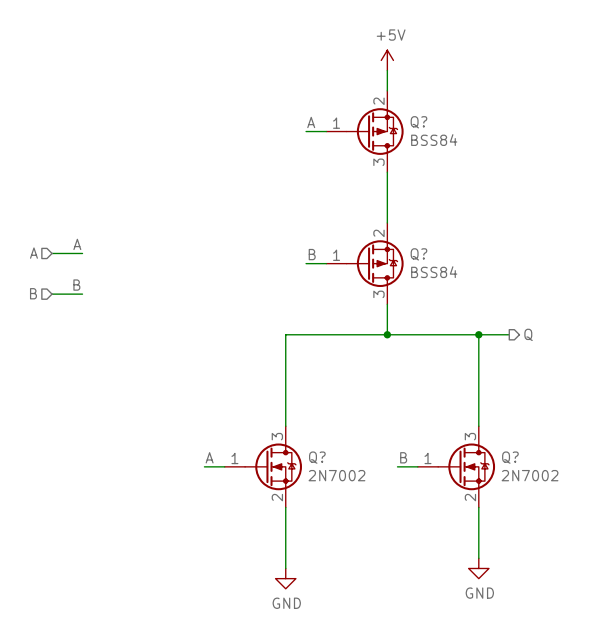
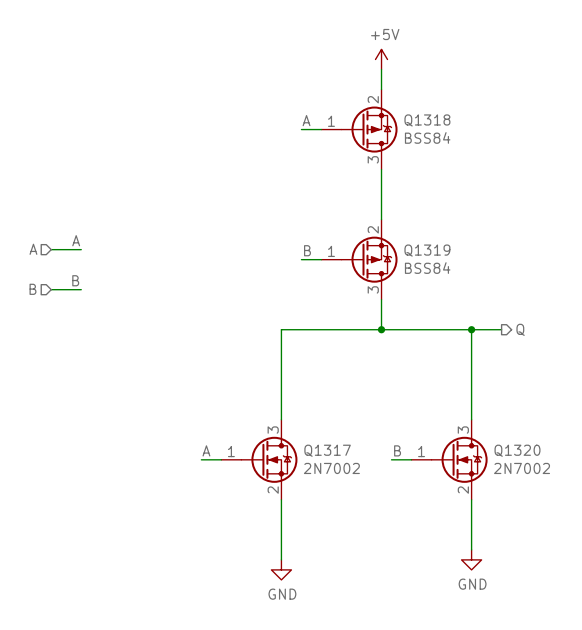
Q? name: Q? (418, 122) -> Q1318 (427, 120)
Q? name: Q? (418, 254) -> Q1319 (427, 250)
Q? name: Q? (317, 457) -> Q1317 (327, 450)
Q? name: Q? (510, 457) -> Q1320 (517, 450)

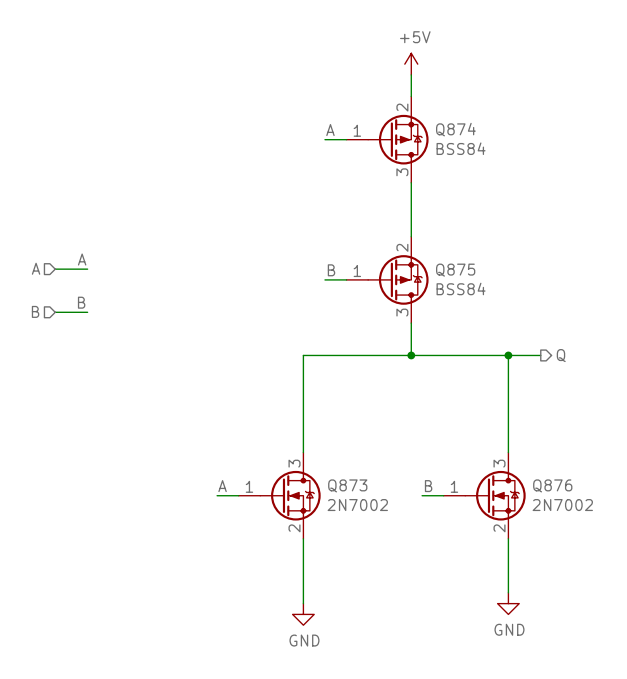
Q1318 name: Q1318 (427, 120) -> Q874 (455, 129)
Q1319 name: Q1319 (427, 250) -> Q875 (455, 270)
Q1317 name: Q1317 (327, 450) -> Q873 (347, 485)
Q1320 name: Q1320 (517, 450) -> Q876 (552, 485)

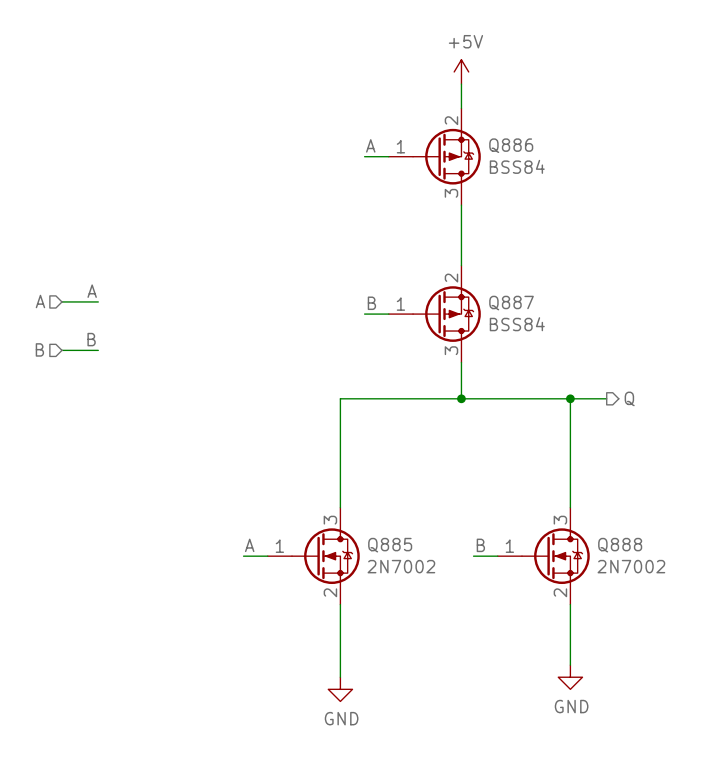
Q874 name: Q874 (455, 129) -> Q886 (511, 145)
Q875 name: Q875 (455, 270) -> Q887 (511, 303)
Q873 name: Q873 (347, 485) -> Q885 (390, 545)
Q876 name: Q876 (552, 485) -> Q888 (620, 545)

